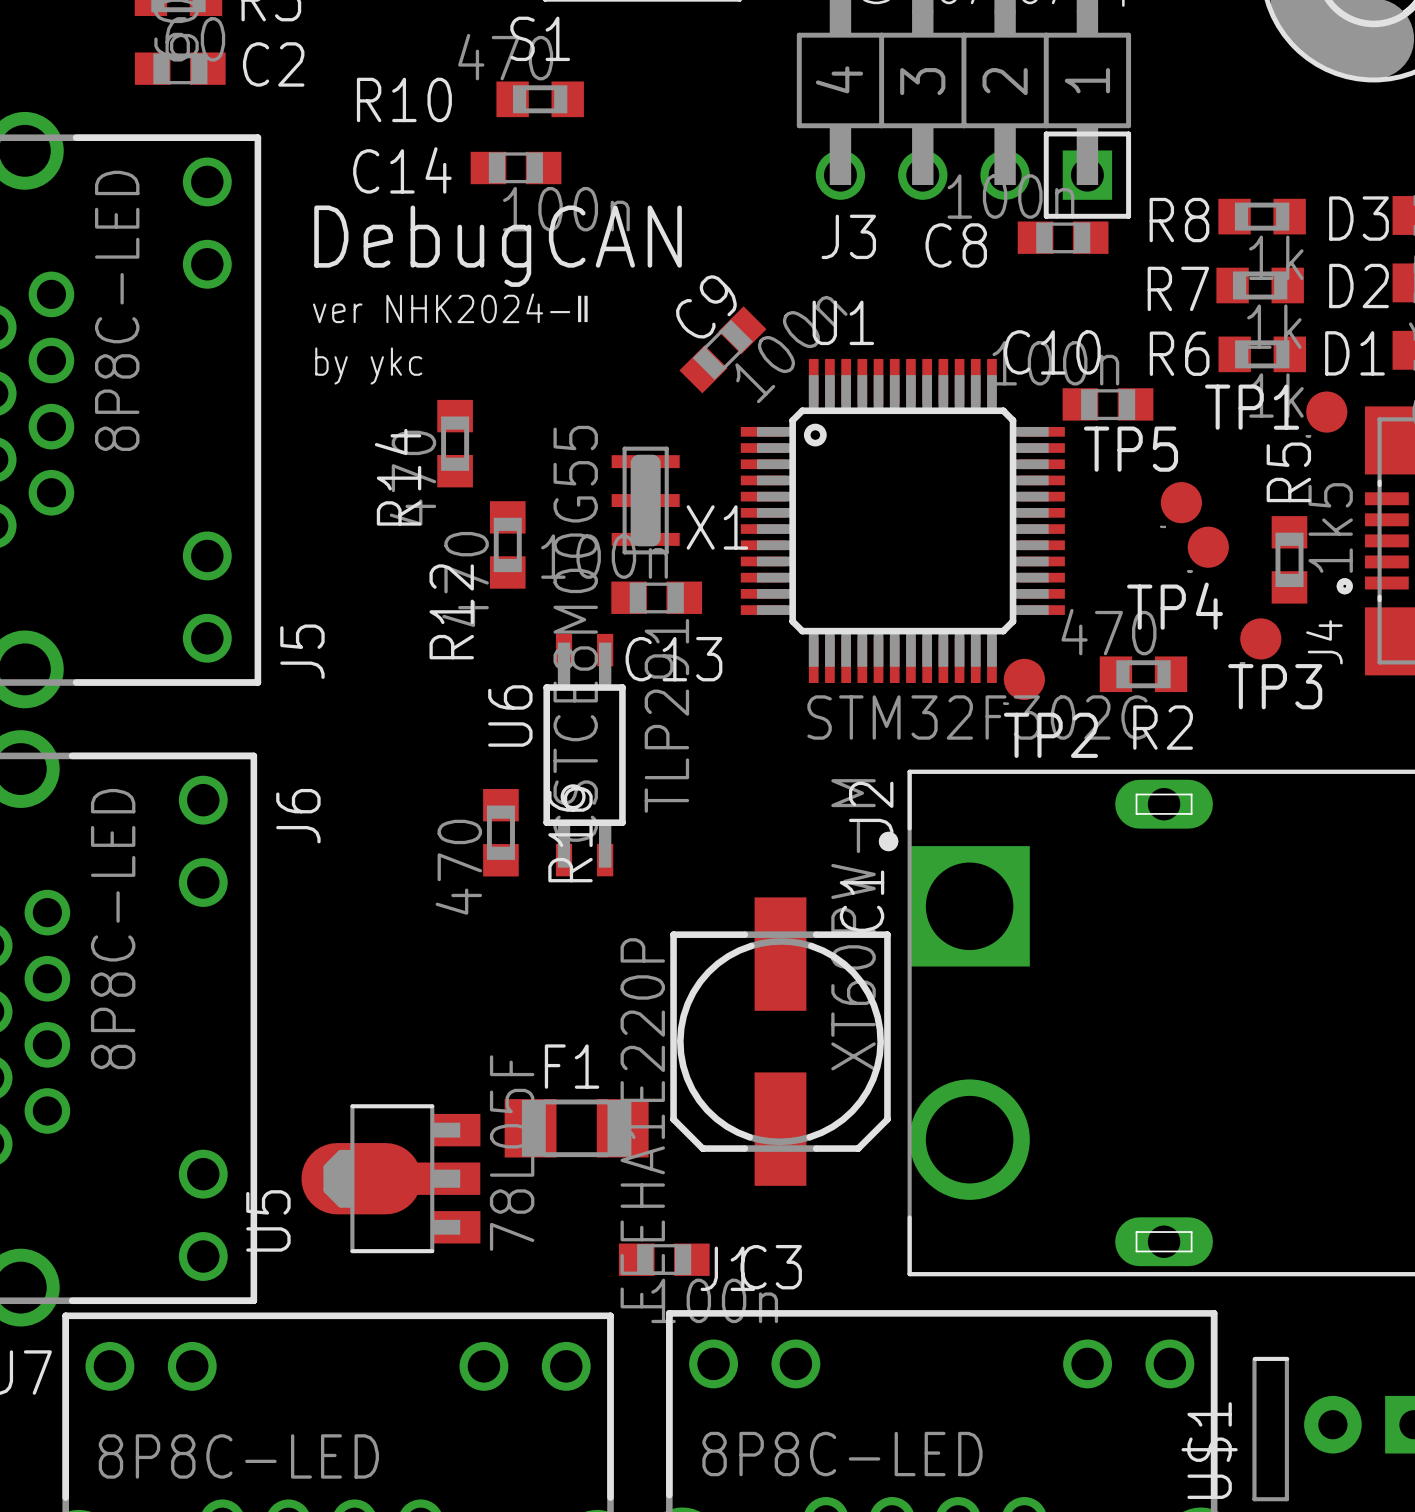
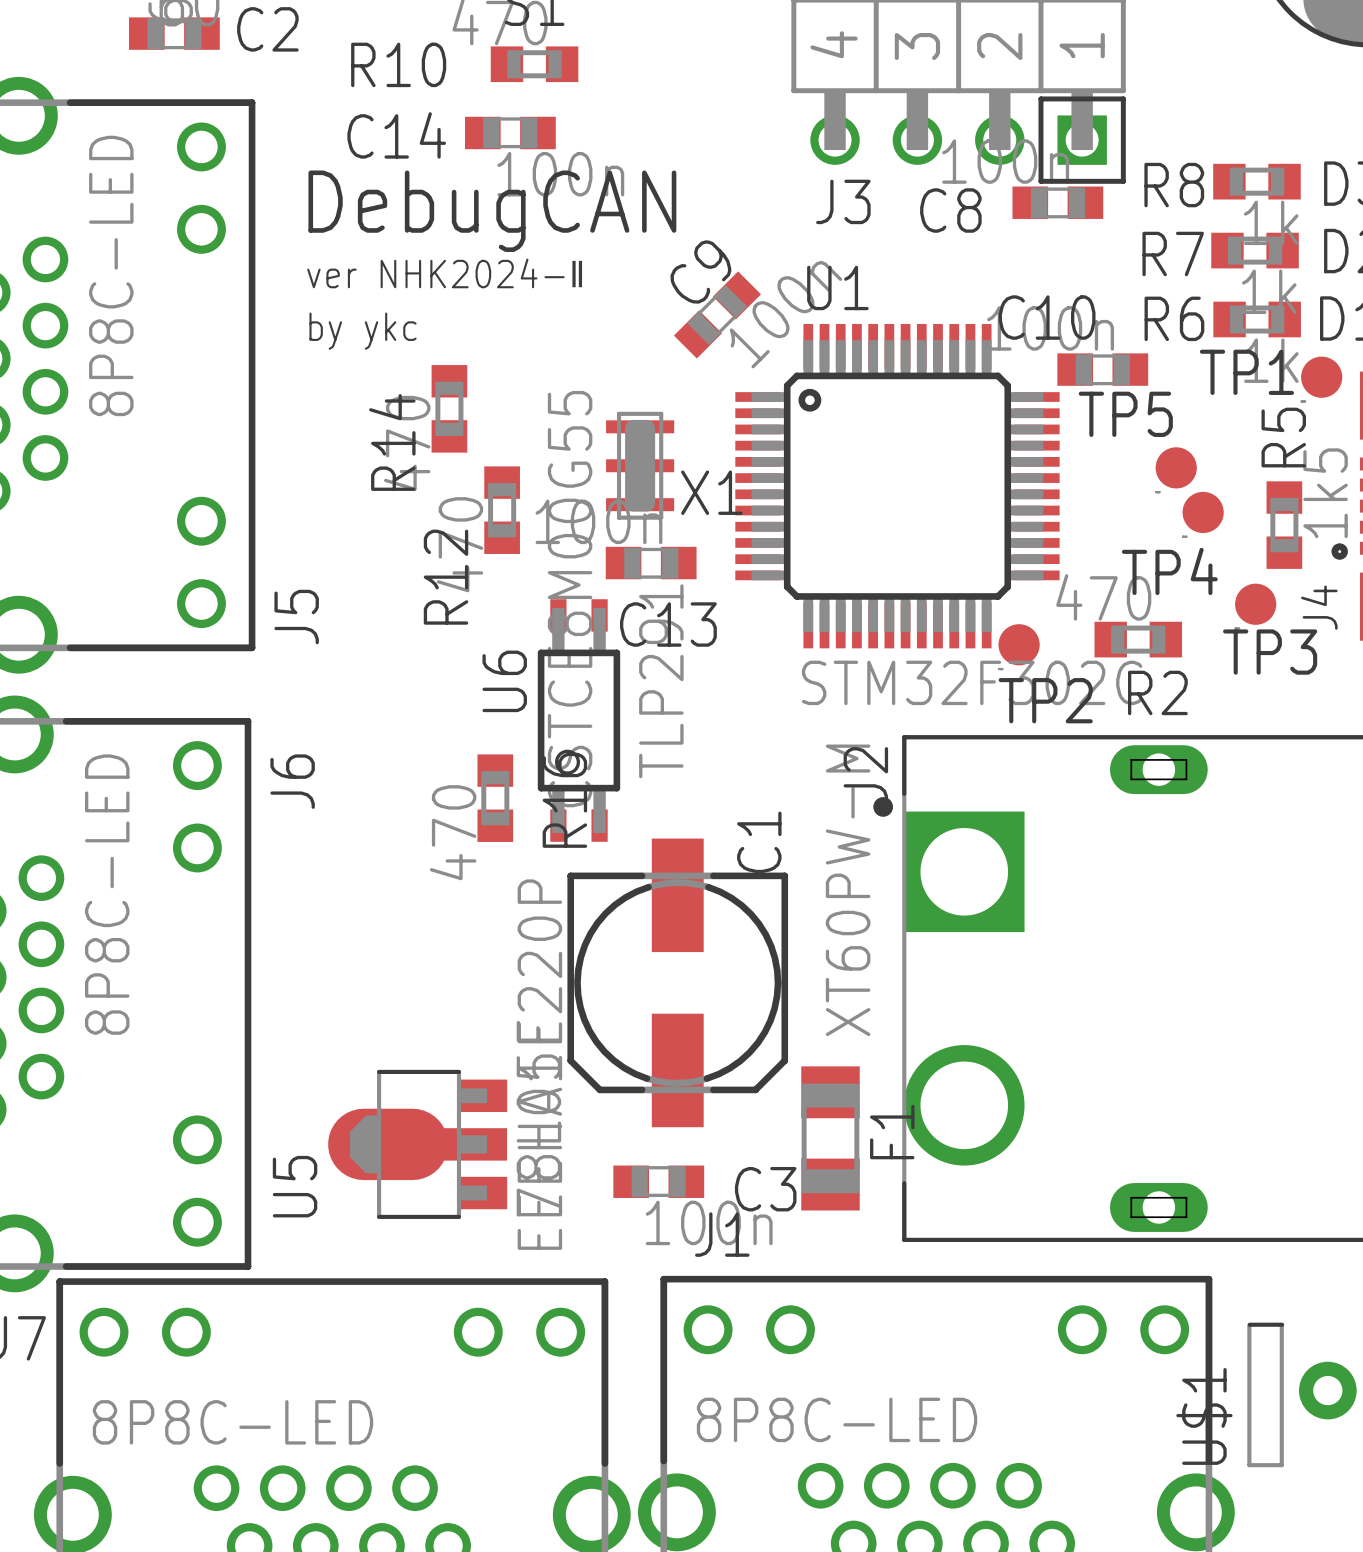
C1 position: (780, 1041) -> (677, 982)
U5 footprint: [301, 1104, 481, 1254] -> [328, 1069, 508, 1219]
F1 rotation: 0° (576, 1128) -> 90° clockwise (830, 1138)
F1 position: (576, 1128) -> (830, 1138)
C3 position: (664, 1259) -> (658, 1181)

